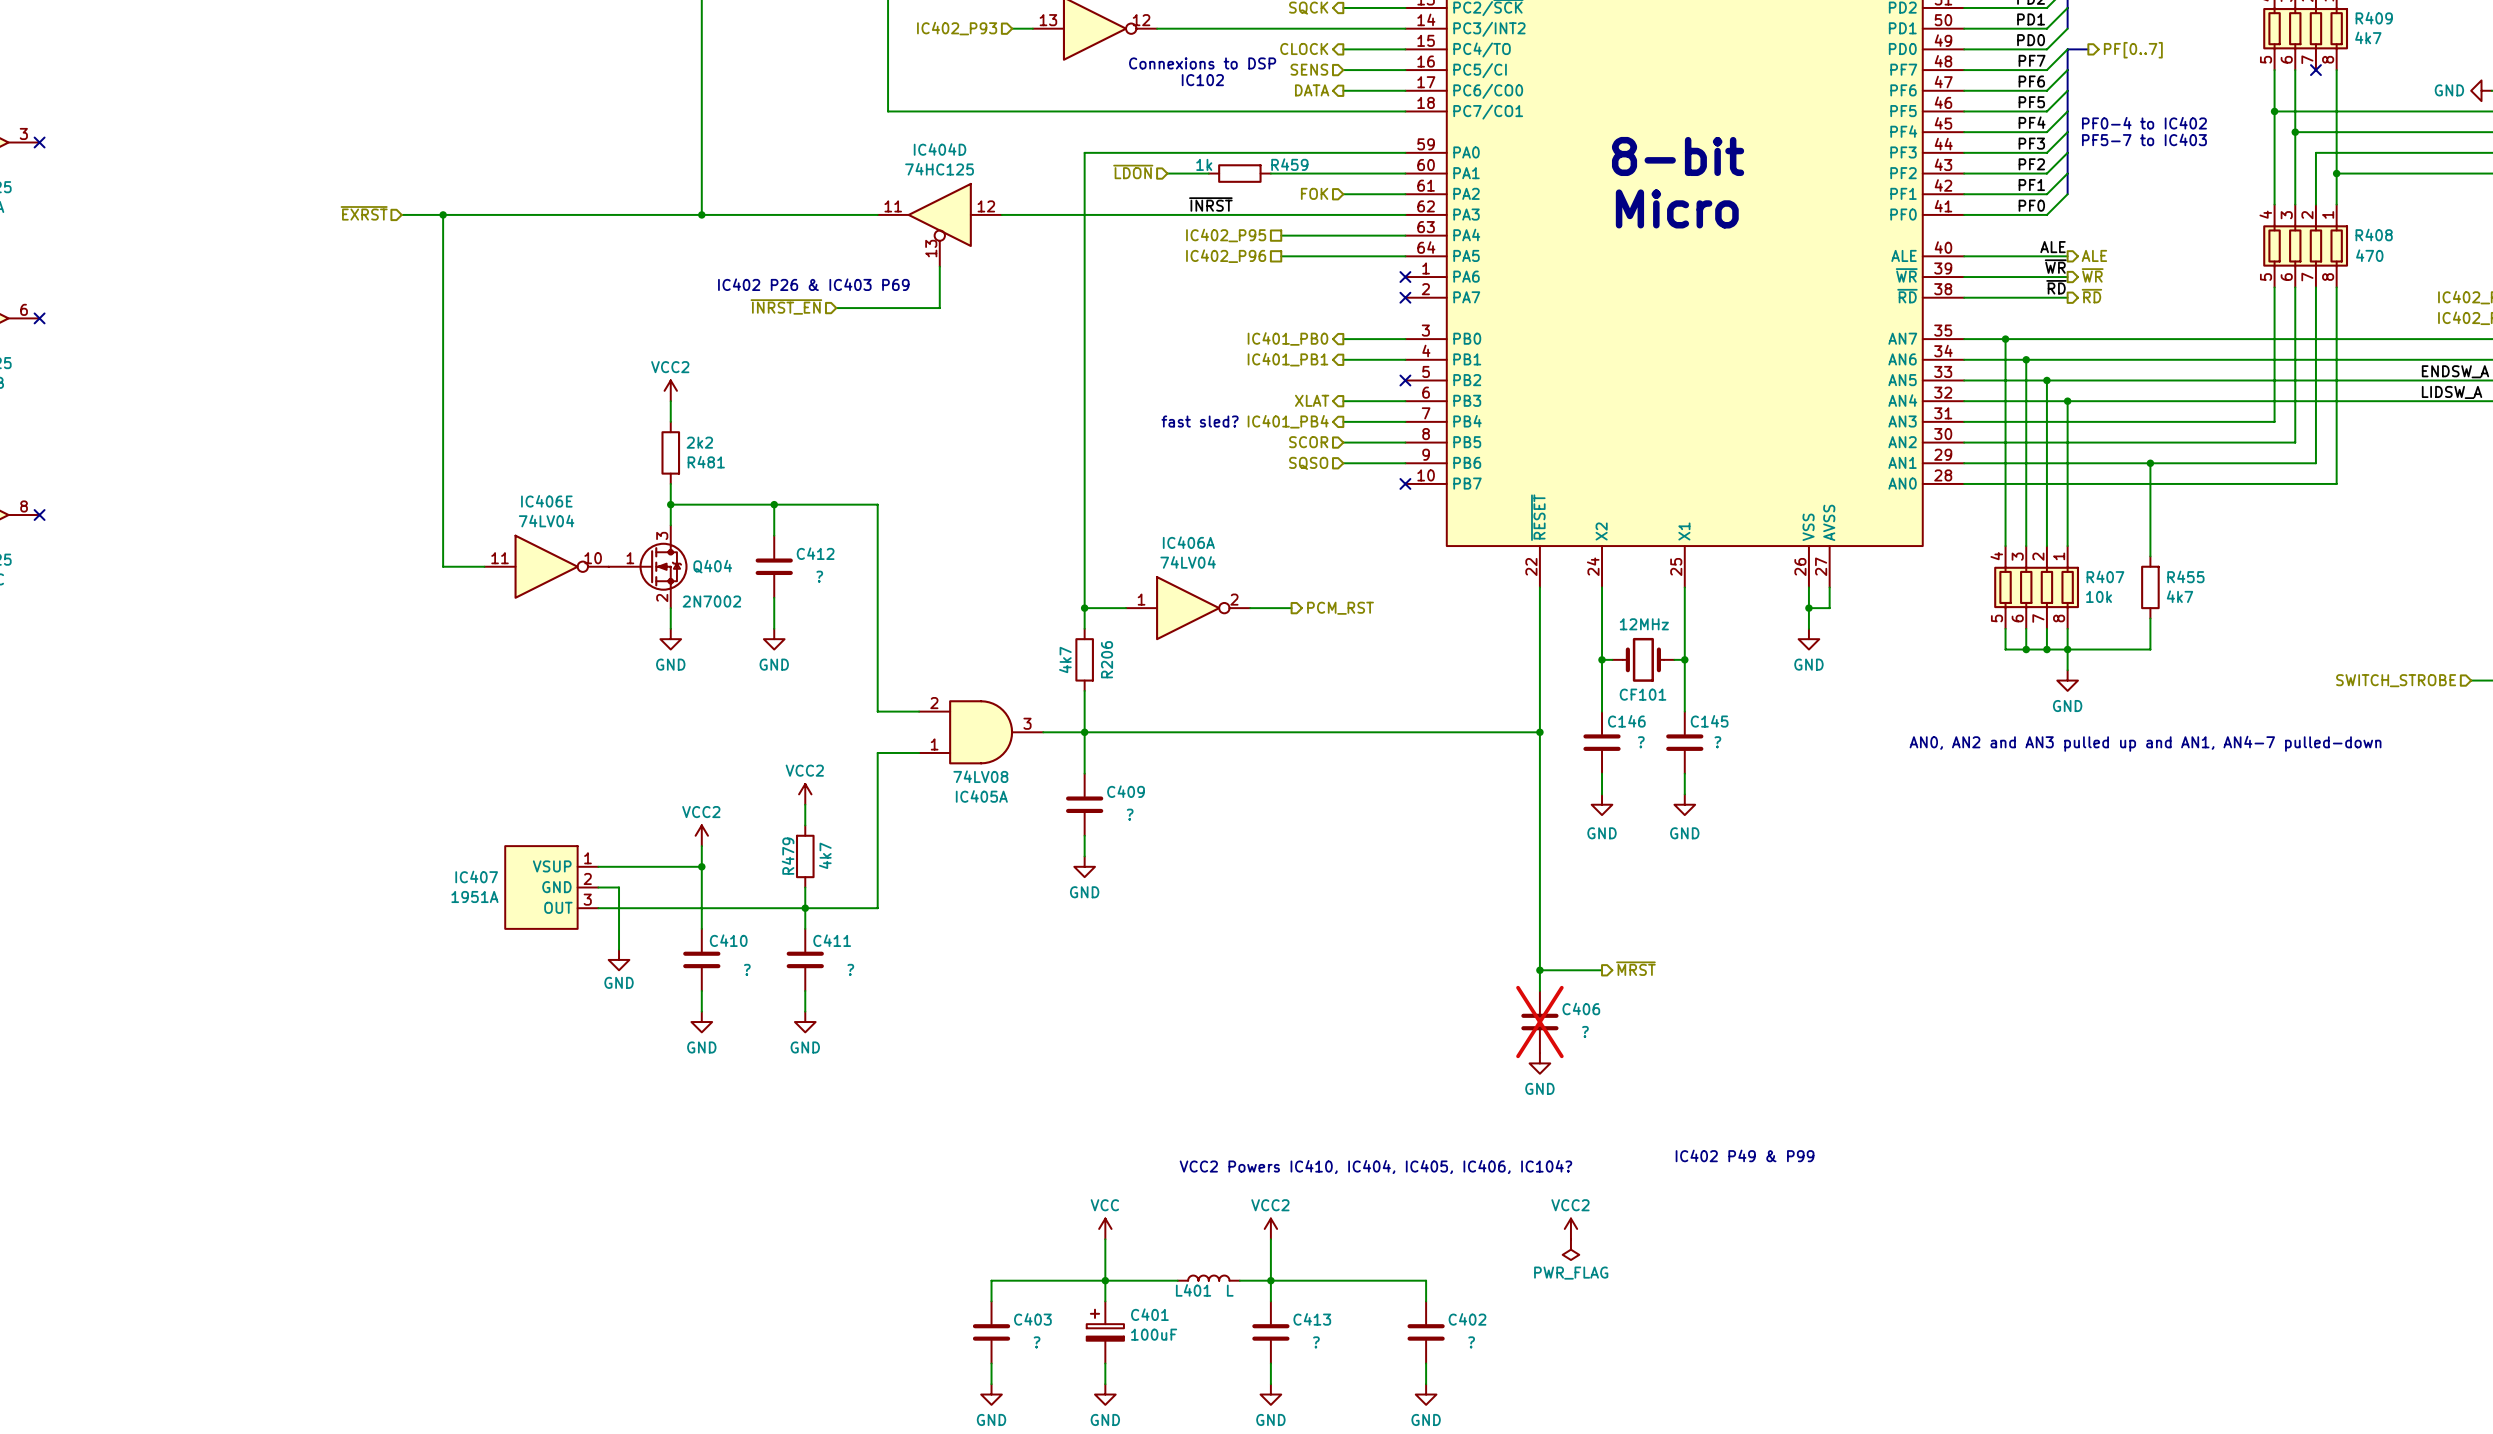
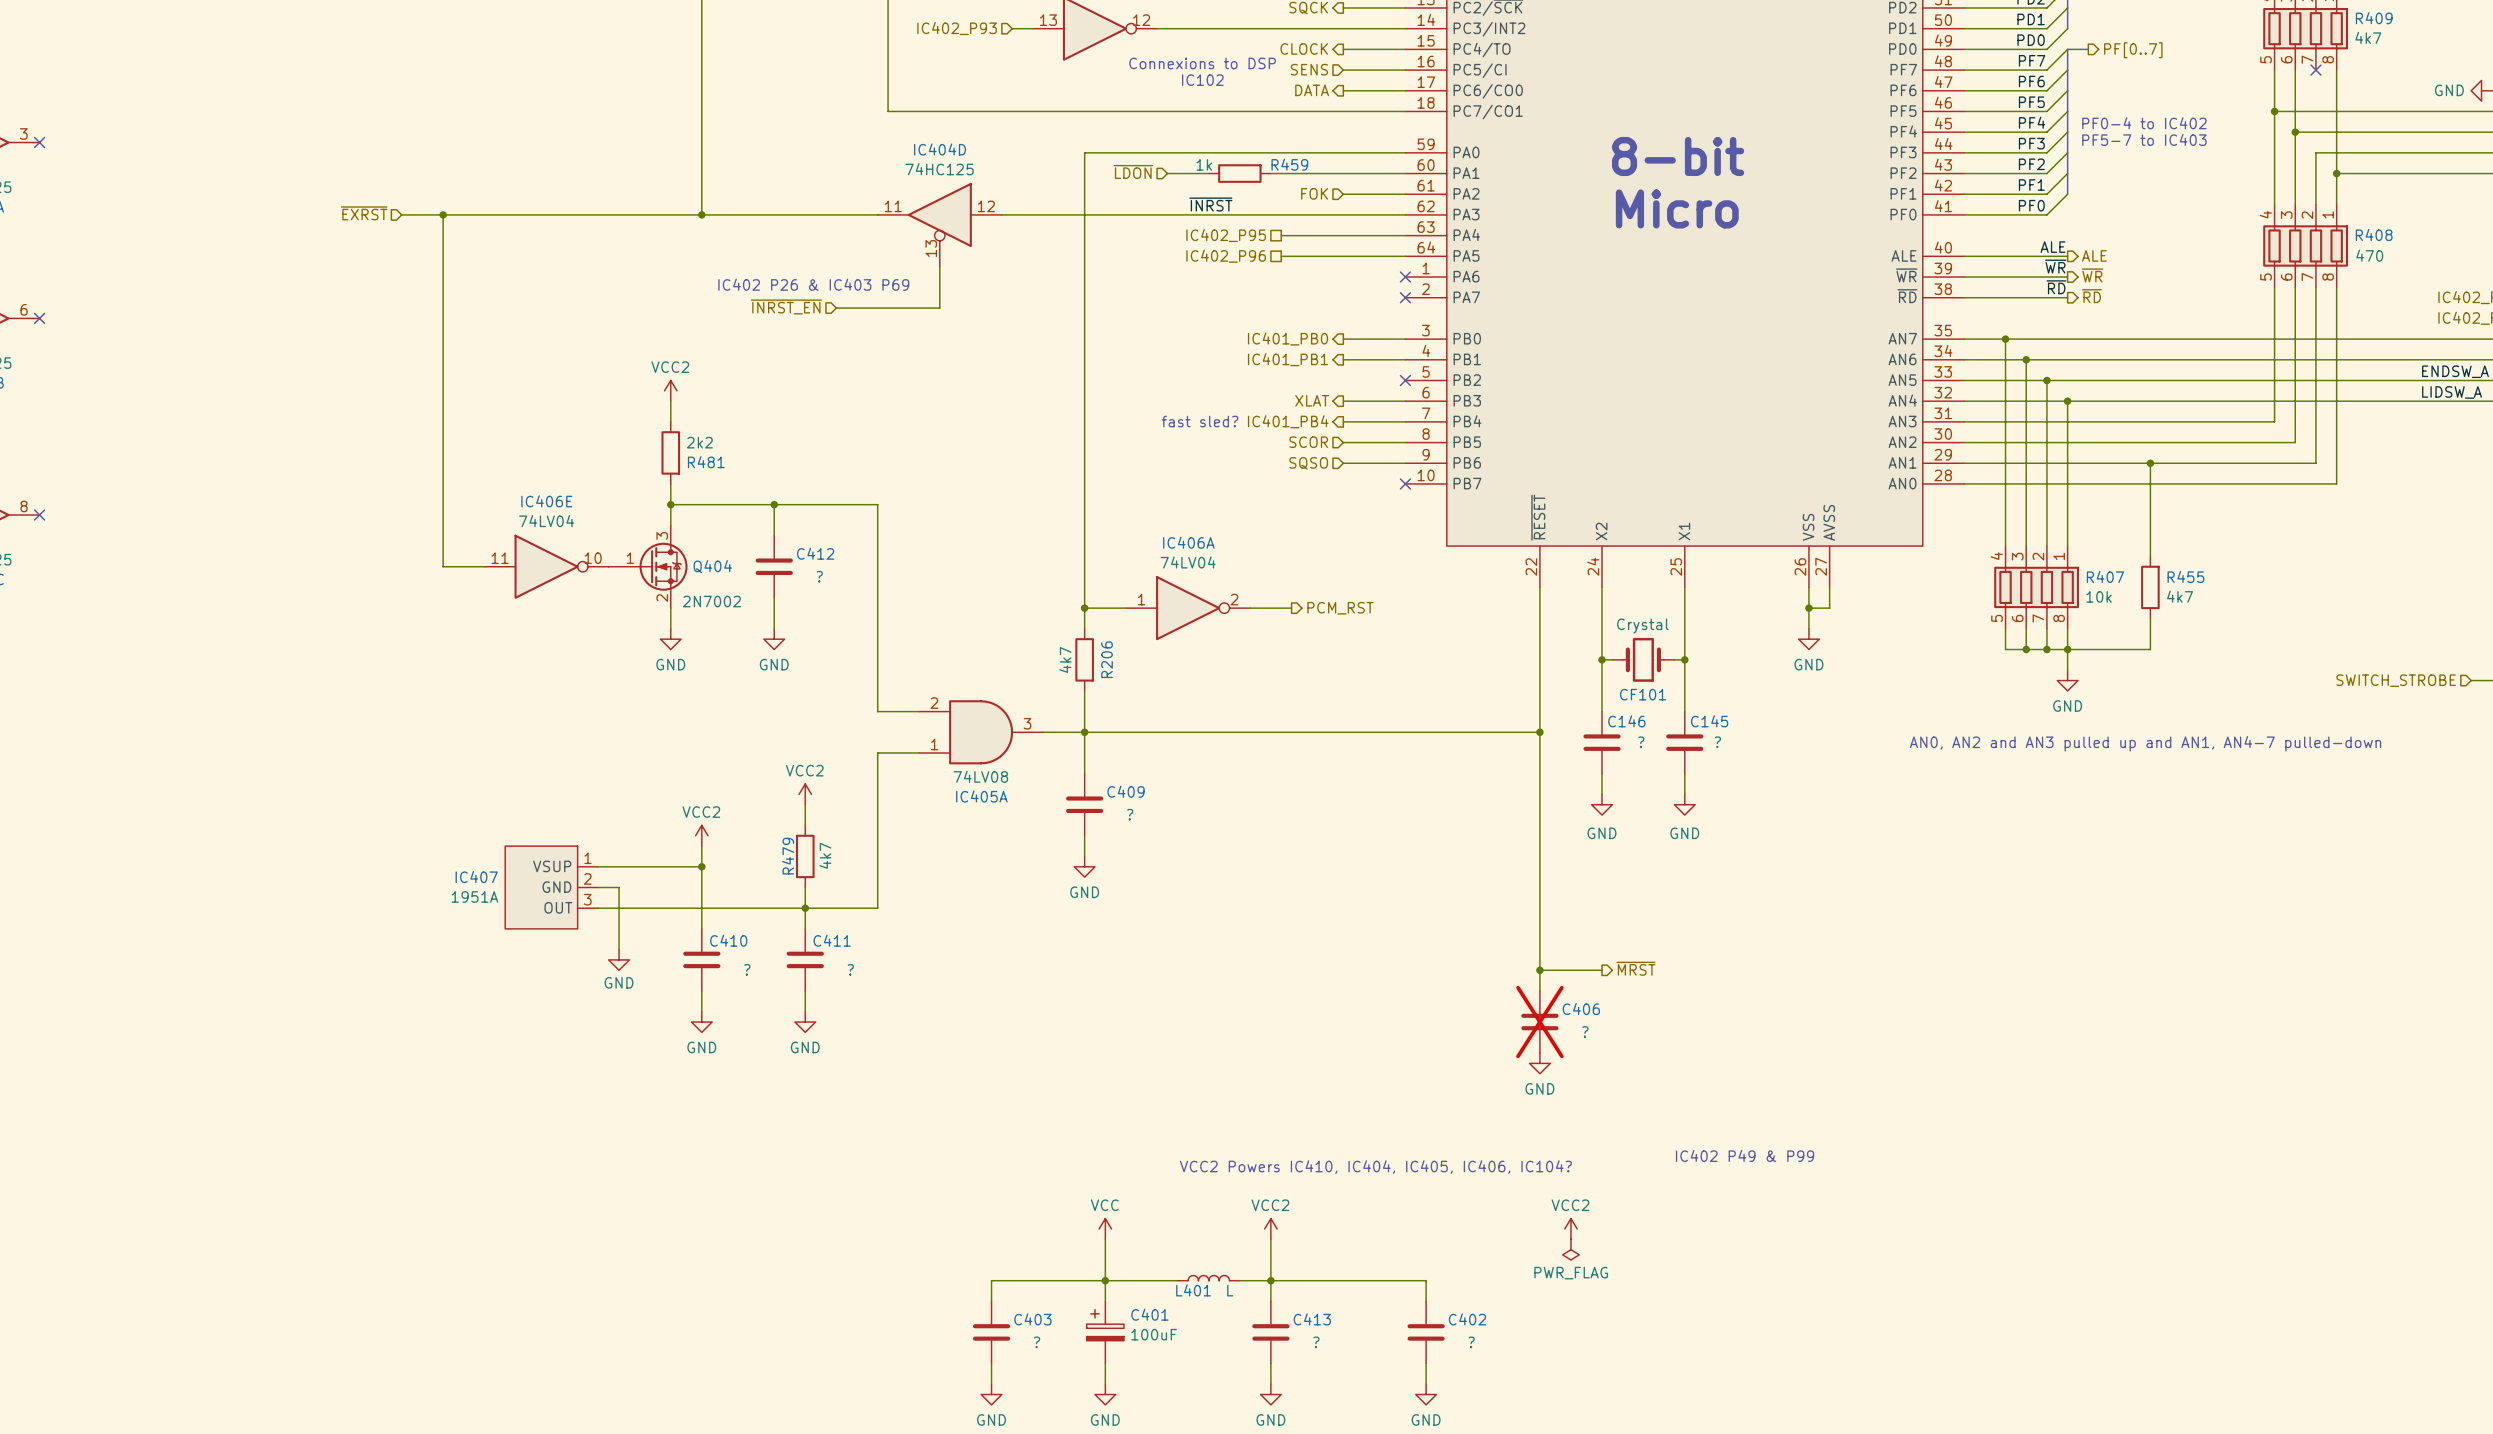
CF101 value: 12MHz (1644, 624) -> Crystal (1642, 626)

